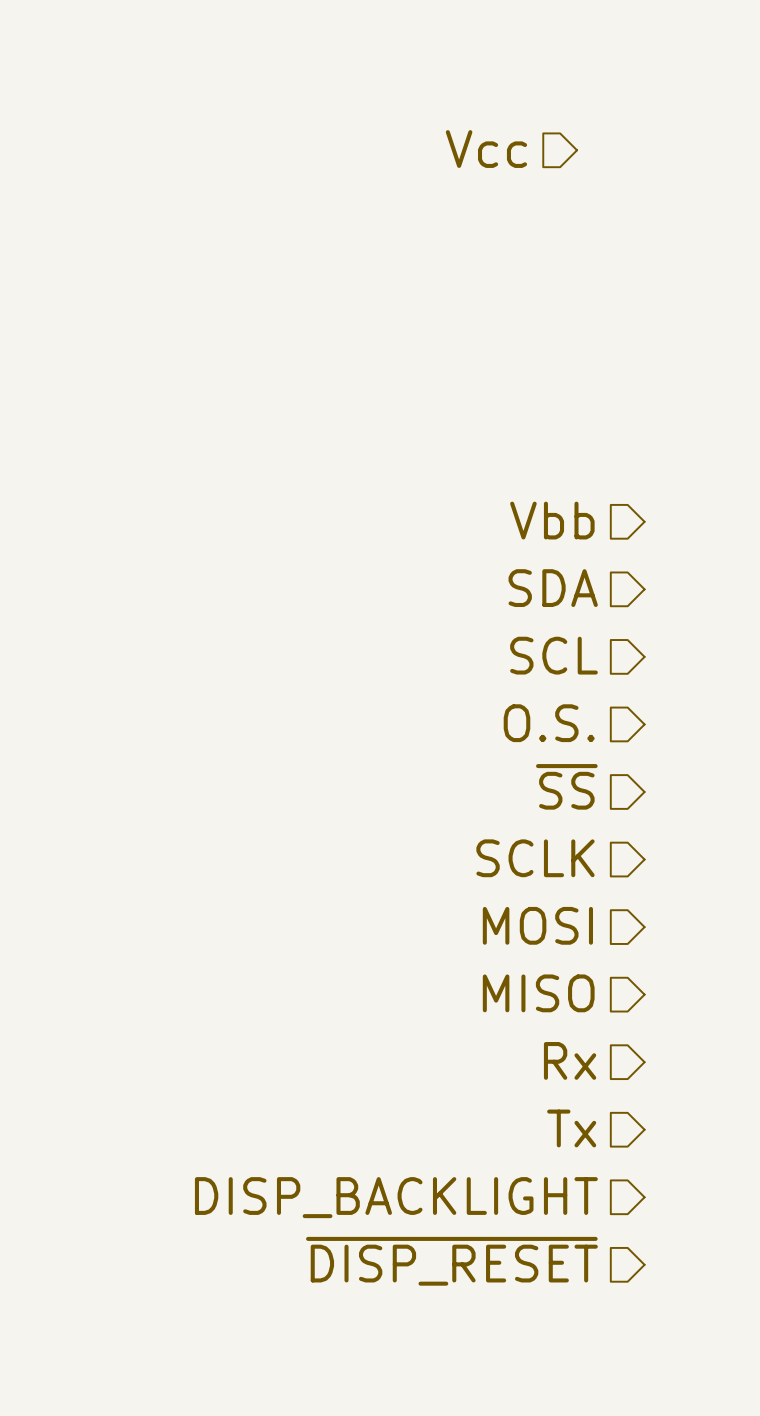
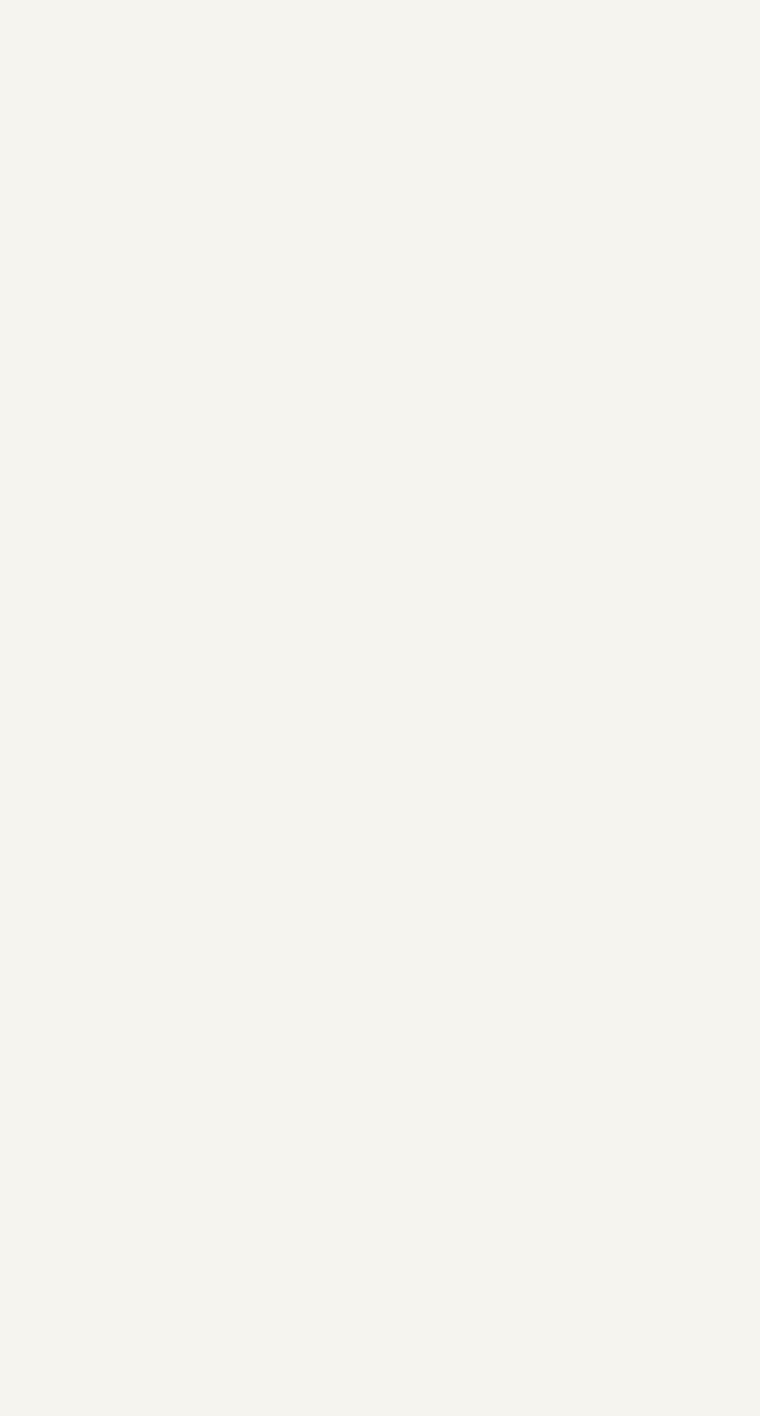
hierarchical label: Vcc (486, 149) -> none
hierarchical label: Vbb (552, 520) -> none
hierarchical label: SDA (553, 588) -> none
hierarchical label: SCL (553, 655) -> none
hierarchical label: O.S. (549, 723) -> none
hierarchical label: ~{SS} (566, 786) -> none
hierarchical label: SCLK (535, 858) -> none
hierarchical label: MOSI (537, 925) -> none
hierarchical label: MISO (538, 993) -> none
hierarchical label: Rx (570, 1060) -> none
hierarchical label: Tx (571, 1128) -> none
hierarchical label: DISP_BACKLIGHT (396, 1197) -> none
hierarchical label: ~{DISP_RESET} (451, 1261) -> none

